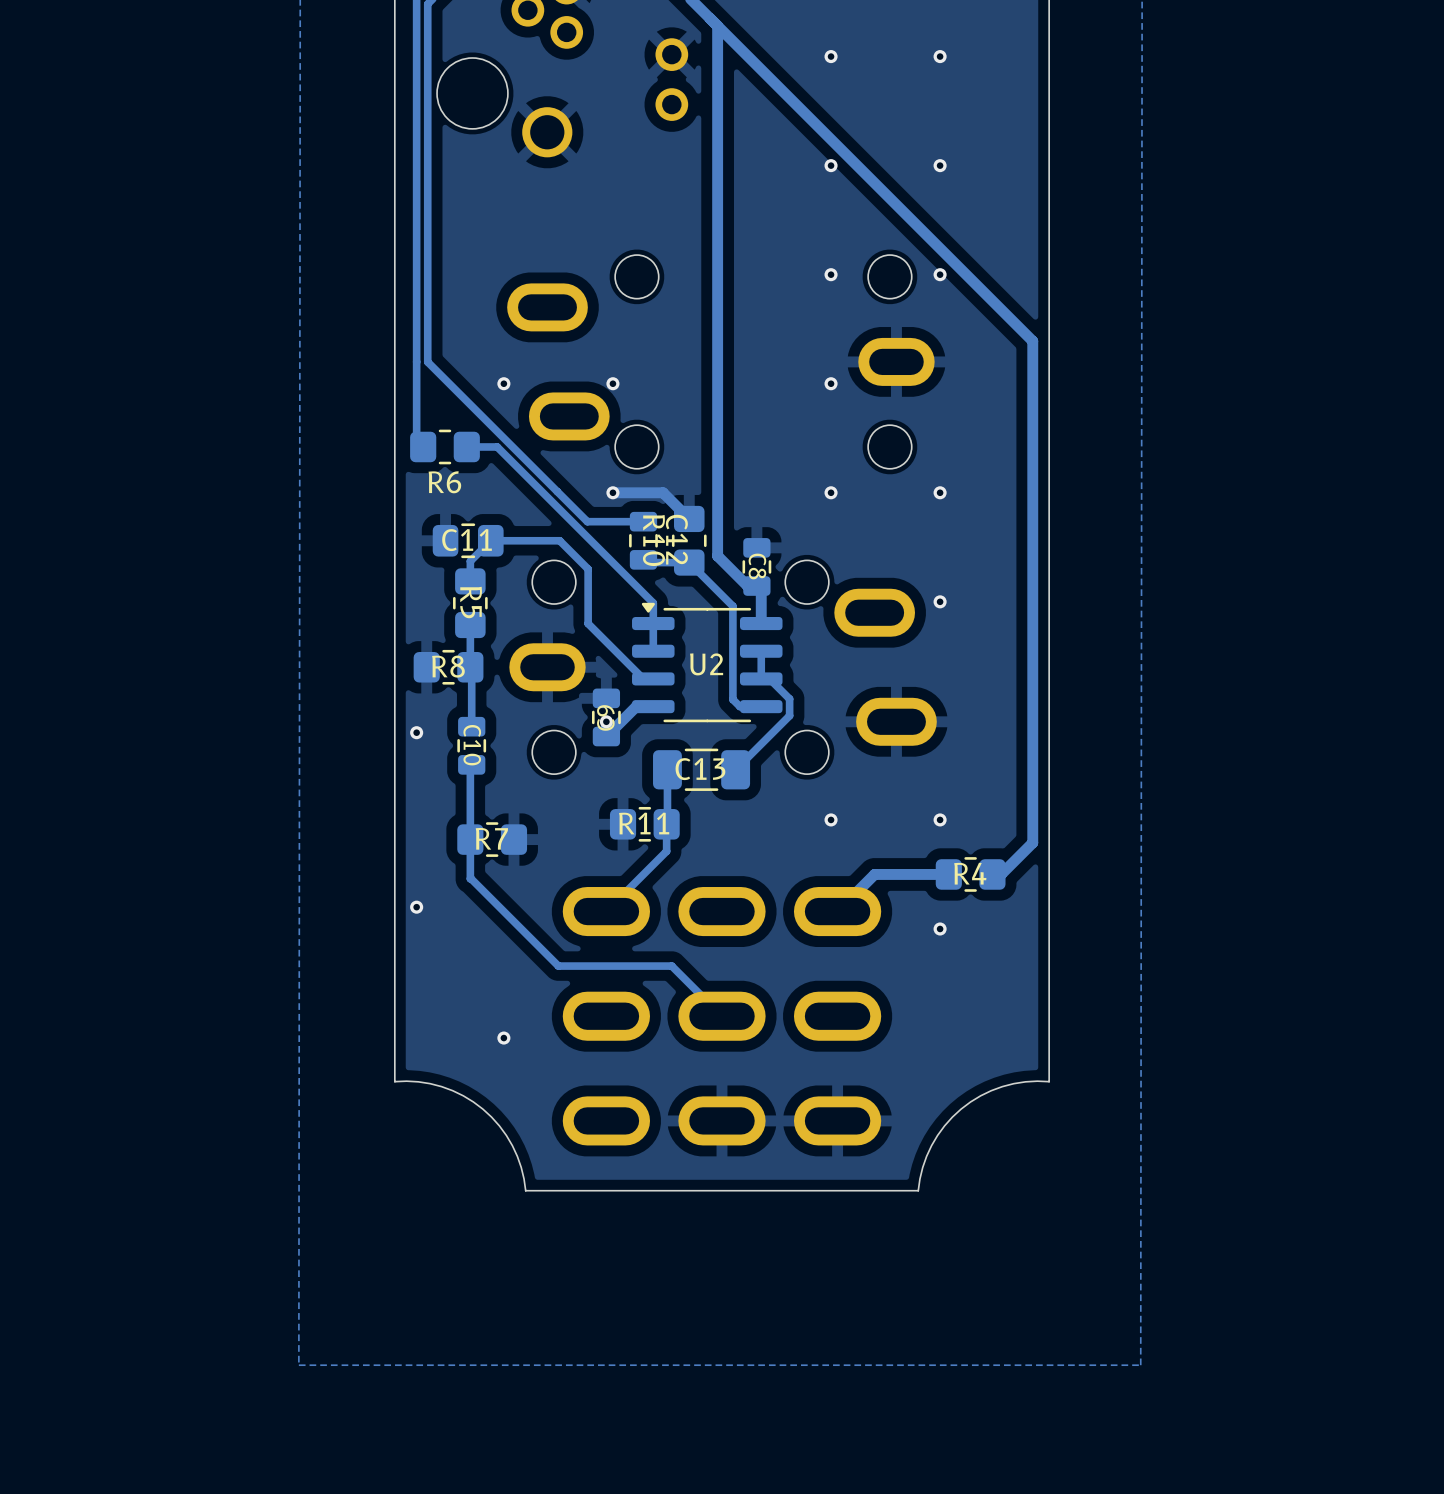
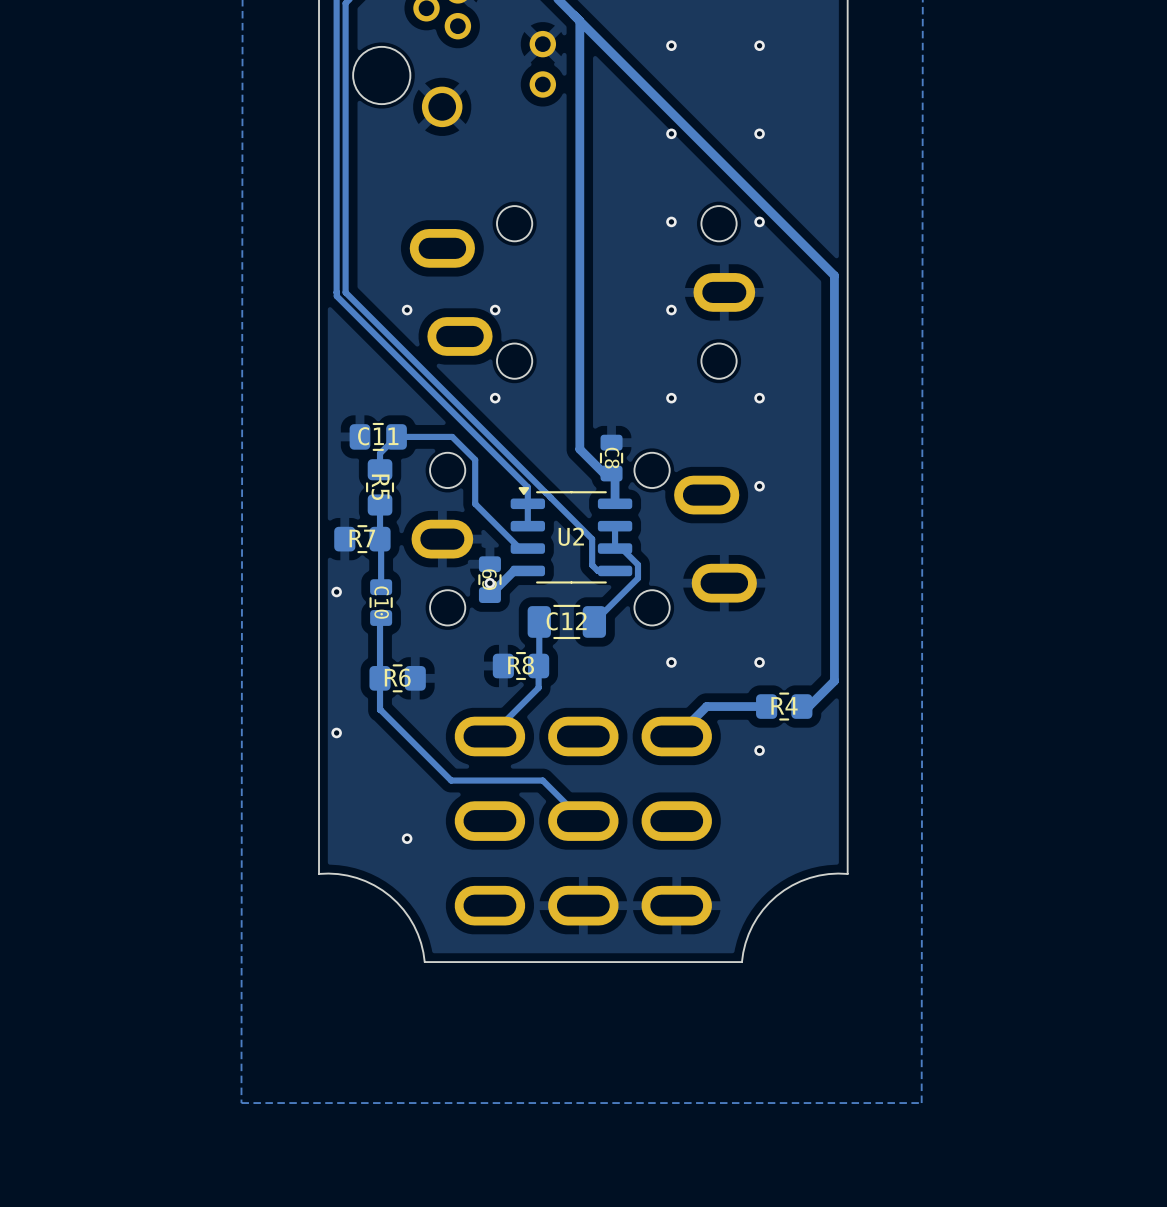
track: (416, 361) (416, 440) (423, 446) -> (336, 292) (336, 296) (401, 361)
R6: (445, 446) -> none
track: (497, 446) (466, 446) -> none
track: (612, 492) (663, 492) (689, 518) -> none
track: (643, 521) (587, 521) -> none
C12: (643, 540) -> none
R10: (689, 540) -> none
track: (643, 559) (646, 562) (689, 562) (732, 606) (732, 667) -> (474, 421) (592, 539)
R8 name: R8 (448, 666) -> R7 (362, 538)
C13 name: C13 (700, 769) -> C12 (566, 621)
R11 name: R11 (644, 823) -> R8 (521, 665)
R7 name: R7 (491, 838) -> R6 (397, 677)

